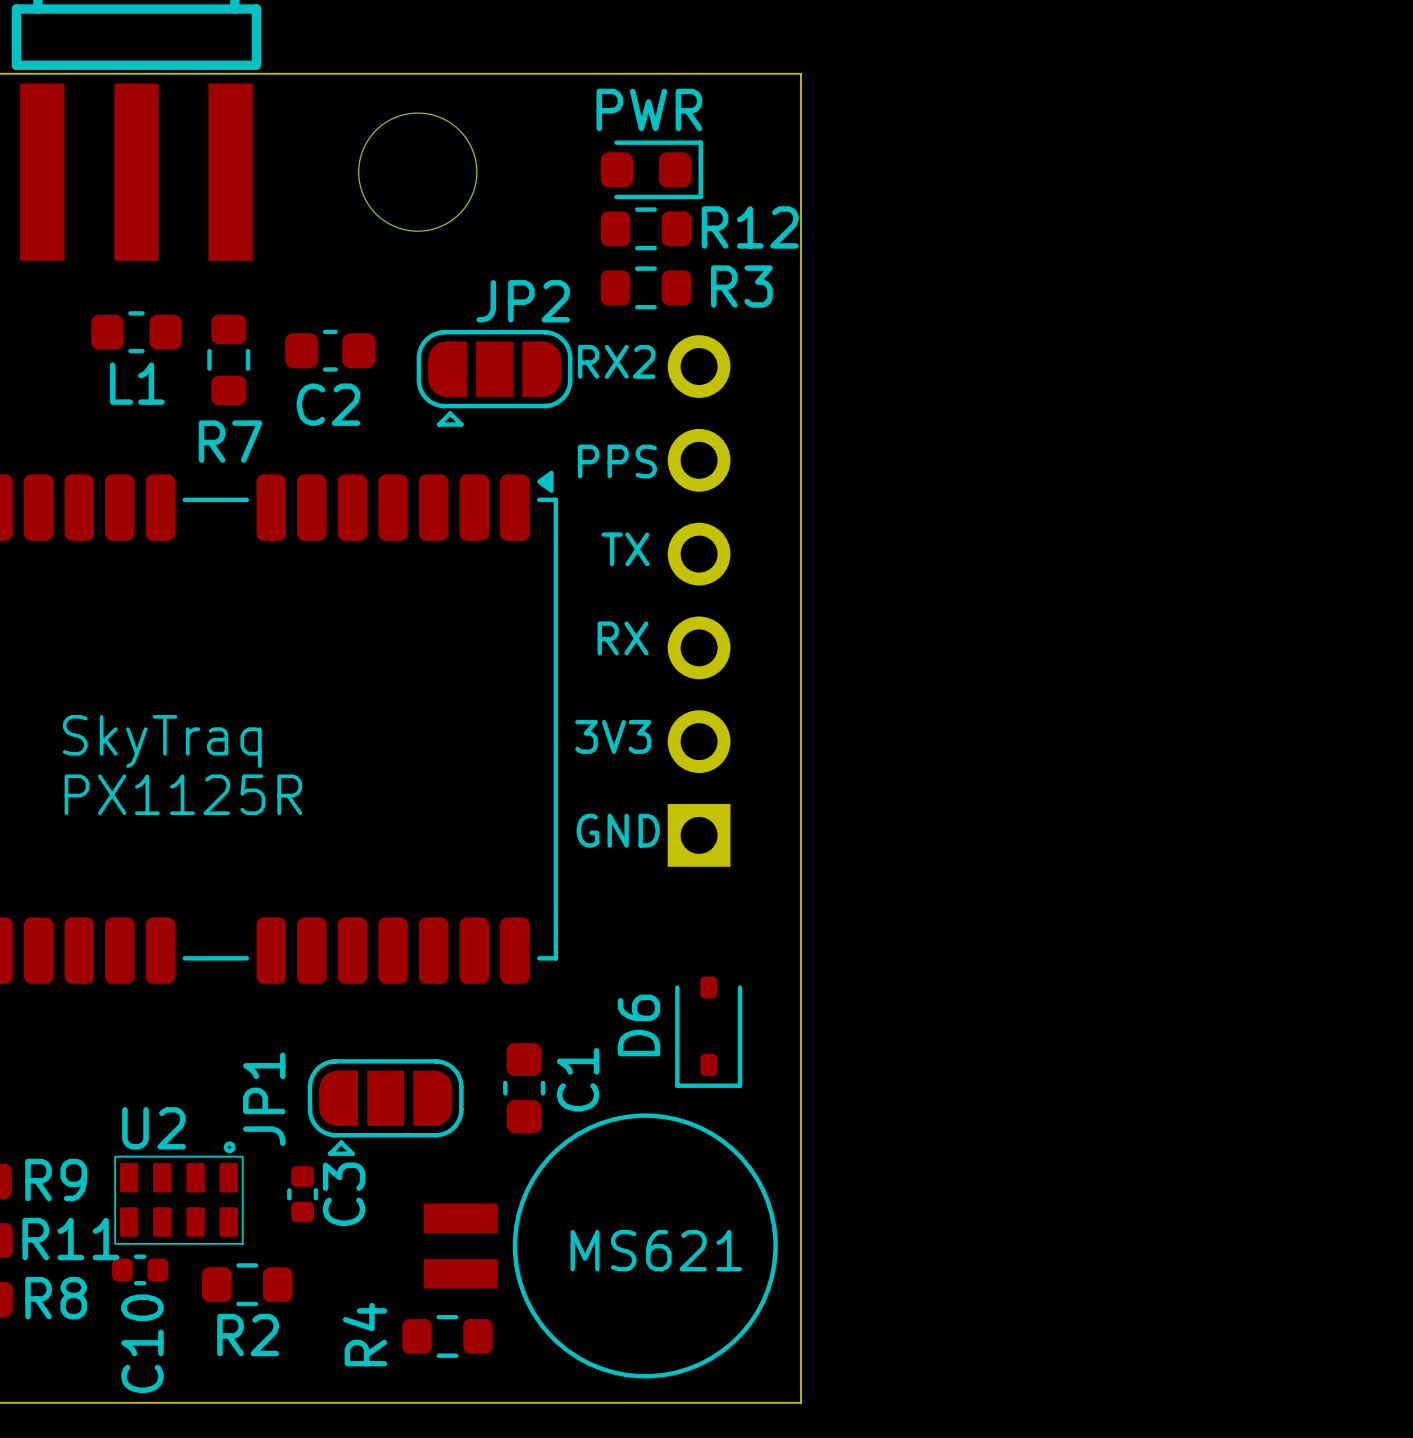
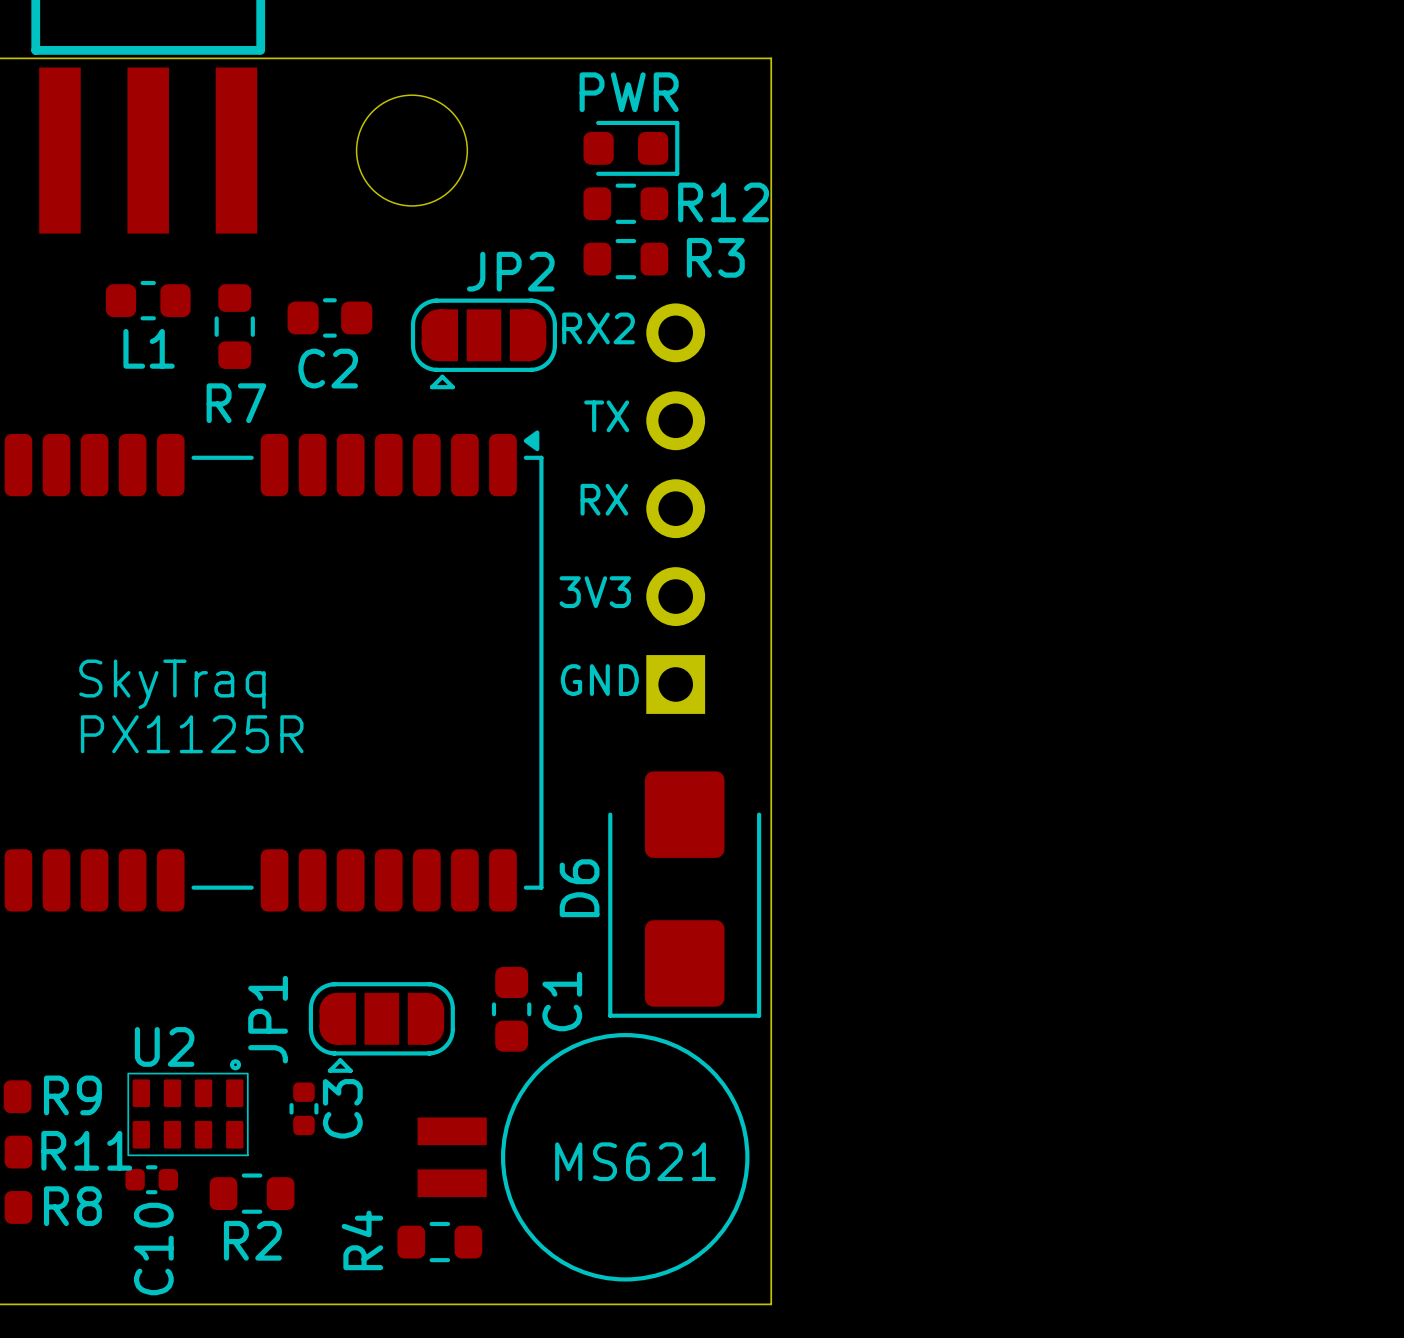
text: PPS (617, 461) -> TX (606, 416)
text: TX (625, 549) -> none
part: none -> (675, 508)
part: (699, 600) -> none
text position: RX (622, 638) -> RX (604, 499)
text: none -> 3V3 (595, 592)
text: 3V3 (613, 736) -> GND (599, 680)
text: GND (618, 830) -> none
D6 footprint: [675, 976, 743, 1088] -> [608, 771, 762, 1018]

